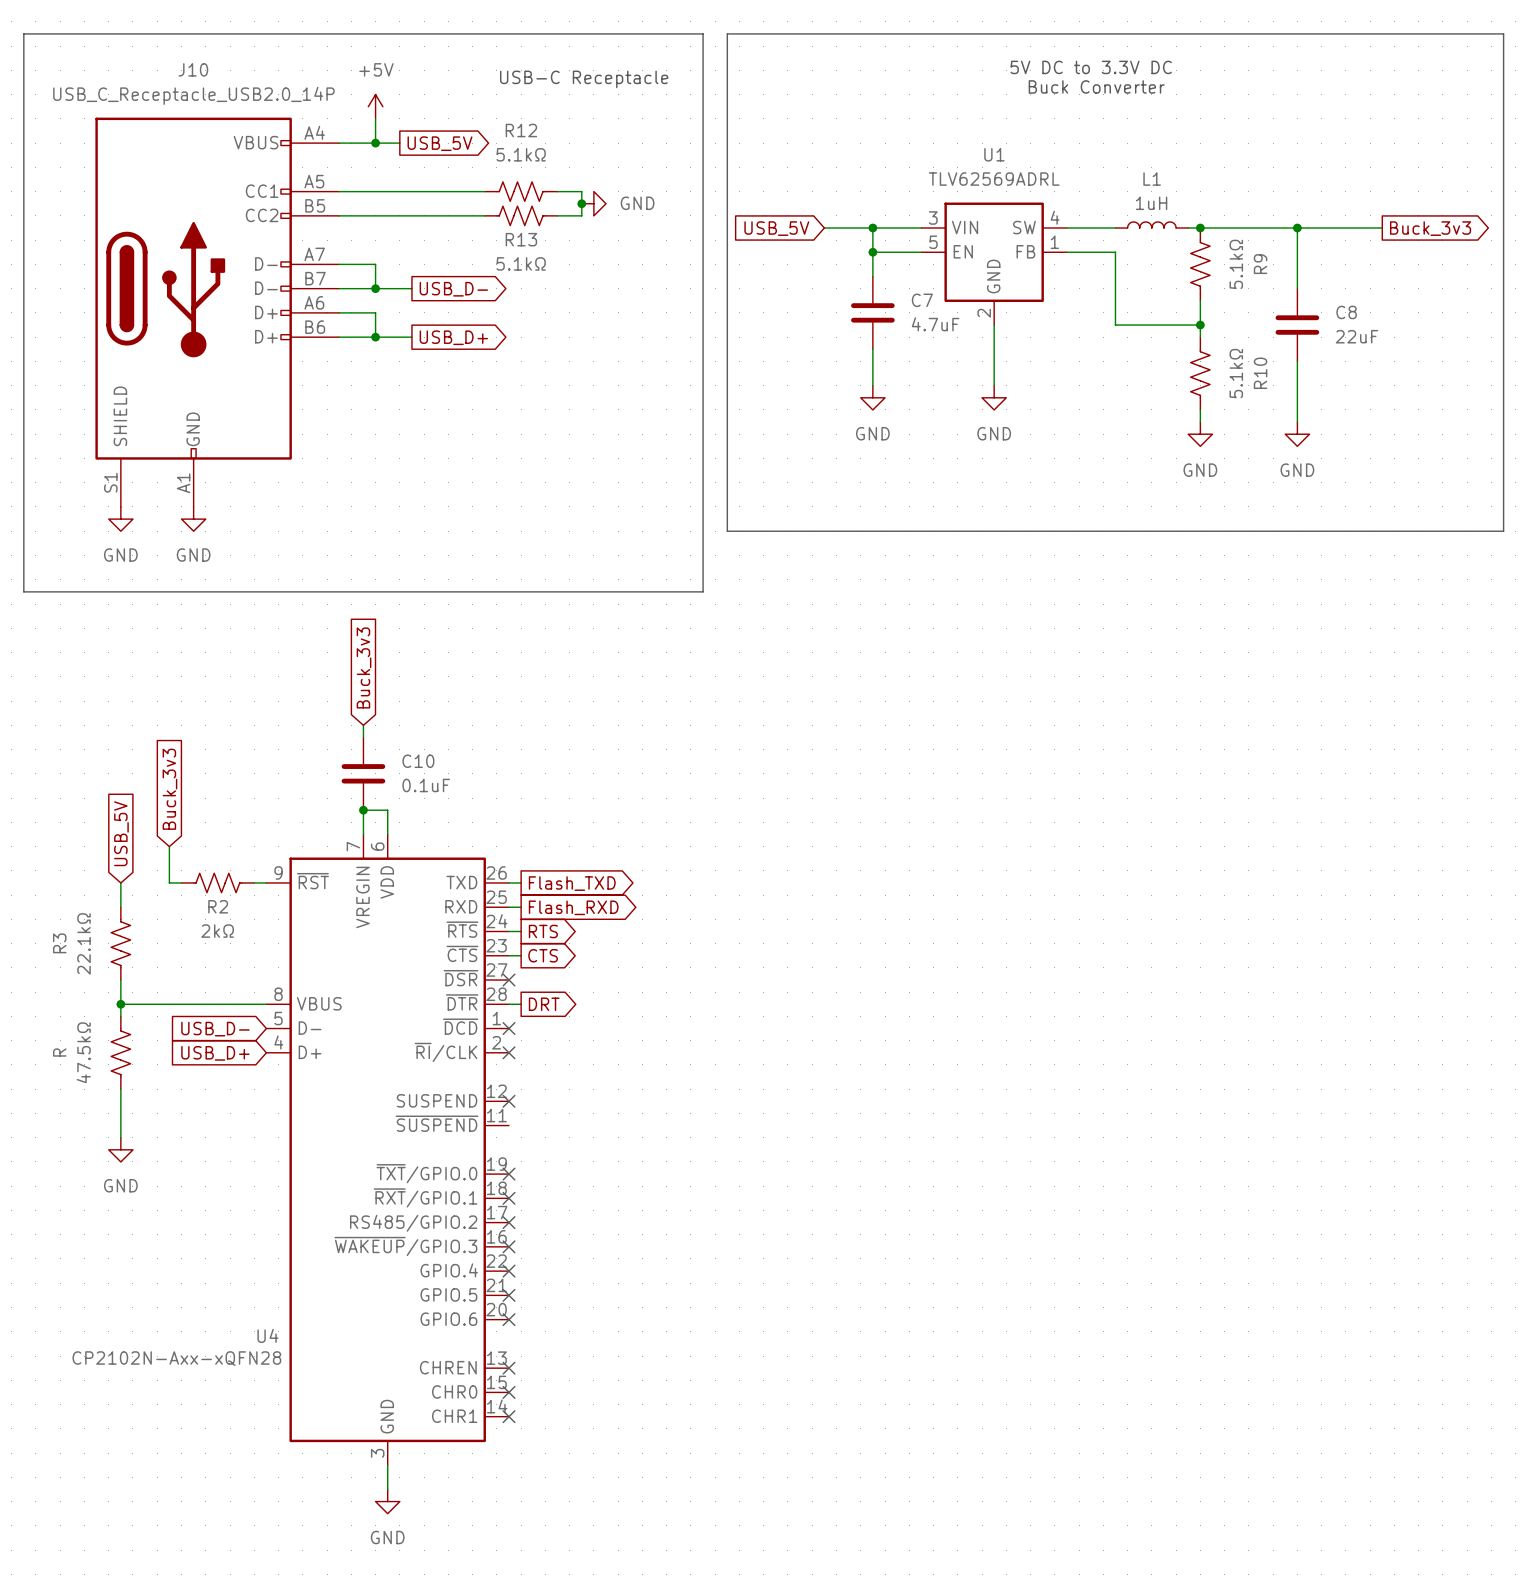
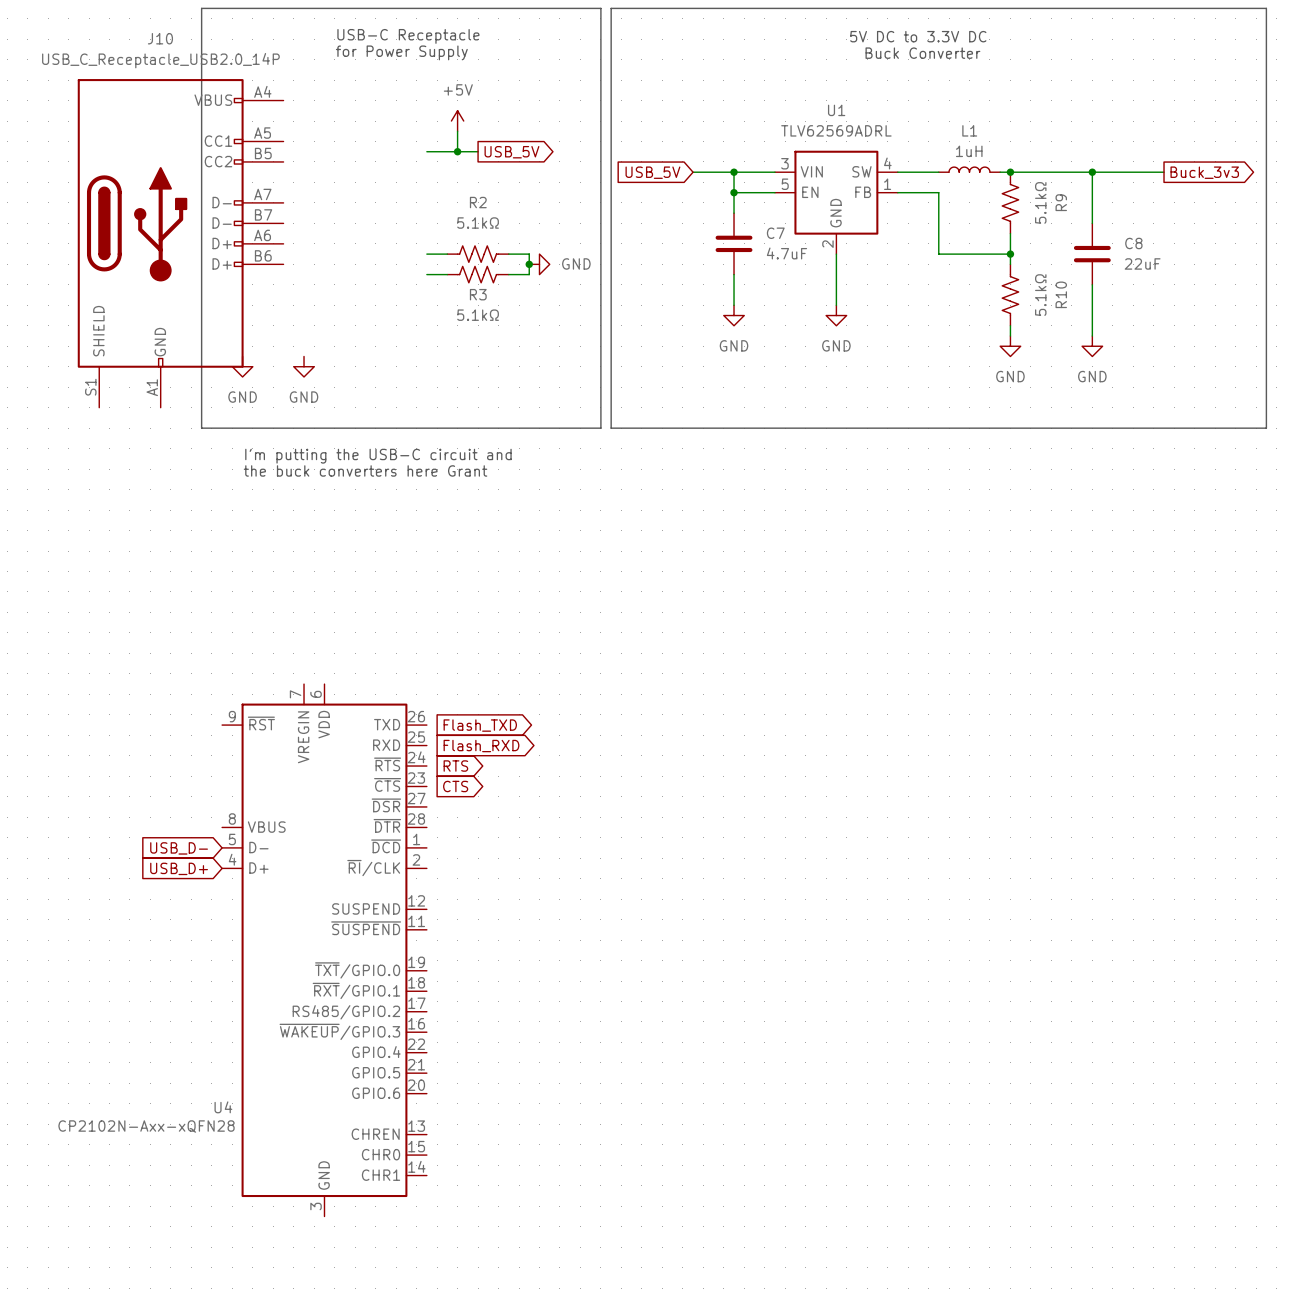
line: (242, 33) (23, 33) (23, 591) (703, 591) (703, 33) -> (201, 8) (201, 428) (600, 428) (600, 8) (590, 8)
text position: USB-C Receptacle (584, 79) -> USB-C Receptacle (408, 36)
text: none -> for Power Supply (401, 52)
power symbol position: +5V (375, 106) -> +5V (457, 121)
wire: (375, 118) (375, 143) -> (457, 131) (457, 151)
wire: (339, 143) (399, 143) -> (426, 151) (478, 151)
junction: (375, 143) -> none
global label position: USB_5V (439, 143) -> USB_5V (511, 152)
wire: (339, 191) (484, 191) -> none
R12: 5.1kΩ (521, 191) -> none
wire: (557, 191) (581, 191) (581, 215) (557, 215) -> (508, 254) (529, 254) (529, 274) (508, 274)
junction position: (581, 203) -> (457, 151)
power symbol position: GND (593, 203) -> GND (539, 264)
wire: (339, 215) (484, 215) -> none
R13: 5.1kΩ (521, 215) -> none
wire: (339, 264) (375, 264) (375, 288) -> none
wire: (339, 288) (411, 288) -> none
junction: (375, 288) -> none
global label: USB_D- (453, 289) -> none
wire: (339, 312) (375, 312) (375, 337) -> none
wire: none -> (426, 254) (447, 254)
wire: (339, 337) (411, 337) -> none
junction: (375, 337) -> none
global label: USB_D+ (453, 337) -> none
junction: none -> (529, 264)
wire: none -> (426, 274) (447, 274)
power symbol: none -> GND (242, 366)
power symbol: none -> GND (304, 366)
power symbol: GND (120, 519) -> none
power symbol: GND (193, 519) -> none
text: none -> I'm putting the USB-C circuit and (378, 456)
text: none -> the buck converters here Grant (365, 470)
global label: Buck_3v3 (364, 667) -> none
wire: (363, 725) (363, 737) -> none
C10: 0.1uF (363, 773) -> none
global label: Buck_3v3 (169, 789) -> none
junction: (363, 810) -> none
global label: USB_5V (121, 833) -> none
wire: (363, 834) (363, 810) (387, 810) (387, 834) -> none
wire: (169, 846) (169, 882) (181, 882) -> none
wire: (120, 882) (120, 907) -> none
R2 position: (217, 882) -> (478, 254)
wire: (254, 882) (266, 882) -> none
wire: (509, 882) (521, 882) -> none
R2 name position: R2 (218, 906) -> R2 (478, 202)
wire: (509, 907) (521, 907) -> none
R2 value: 2kΩ (217, 931) -> 5.1kΩ (478, 223)
wire: (509, 931) (521, 931) -> none
R3 name position: R3 (59, 943) -> R3 (478, 294)
R3 value: 22.1kΩ (84, 943) -> 5.1kΩ (478, 315)
R3 rotation: 0° (120, 943) -> 90° clockwise (478, 274)
R3 position: (120, 943) -> (478, 274)
wire: (509, 955) (521, 955) -> none
wire: (120, 980) (120, 1016) -> none
no-connect mark: (509, 980) -> none
wire: (120, 1004) (266, 1004) -> none
junction: (120, 1004) -> none
wire: (509, 1004) (521, 1004) -> none
global label: DRT (544, 1004) -> none
no-connect mark: (509, 1028) -> none
R: 47.5kΩ (120, 1052) -> none
no-connect mark: (509, 1052) -> none
wire: (120, 1089) (120, 1137) -> none
no-connect mark: (509, 1101) -> none
power symbol: GND (120, 1149) -> none
no-connect mark: (509, 1174) -> none
no-connect mark: (509, 1198) -> none
no-connect mark: (509, 1222) -> none
no-connect mark: (509, 1246) -> none
no-connect mark: (509, 1271) -> none
no-connect mark: (509, 1295) -> none
no-connect mark: (509, 1319) -> none
no-connect mark: (509, 1368) -> none
no-connect mark: (509, 1392) -> none
no-connect mark: (509, 1416) -> none
wire: (387, 1465) (387, 1489) -> none
power symbol: GND (387, 1501) -> none

